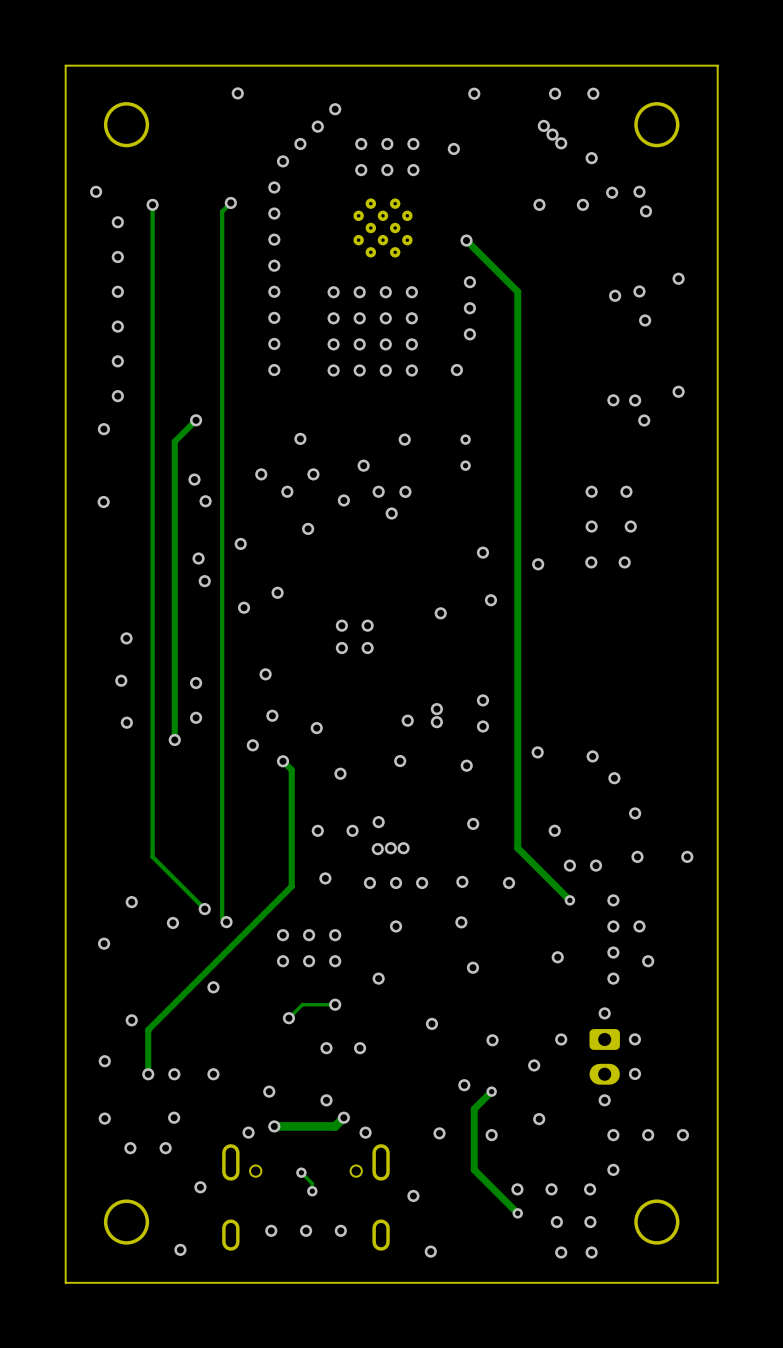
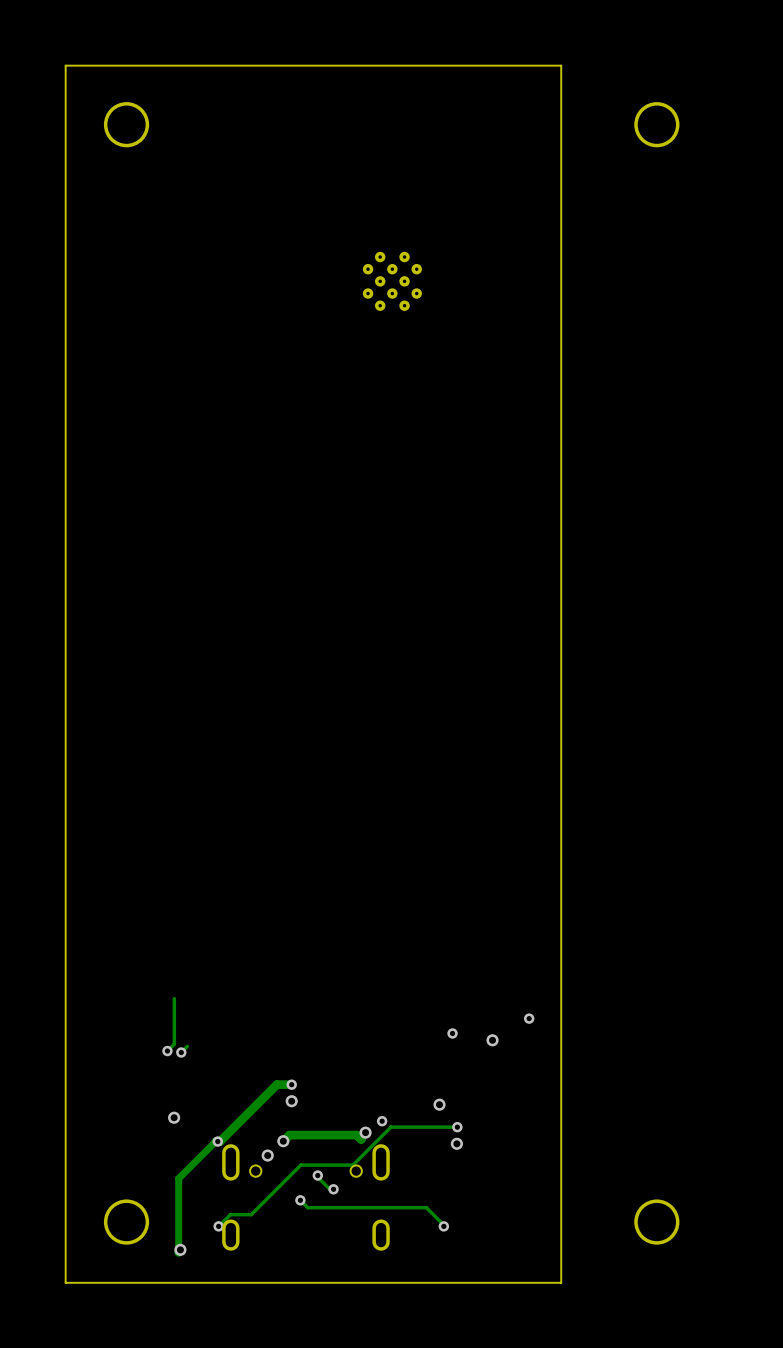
board edge: (561, 65) (717, 65) (717, 1282) (561, 1282) -> (561, 65) (561, 1282)
via: (237, 93) -> none
via: (474, 93) -> none
via: (555, 93) -> none
via: (593, 93) -> none
via: (335, 109) -> none
via: (543, 125) -> none
via: (317, 126) -> none
via: (552, 134) -> none
via: (561, 143) -> none
via: (300, 144) -> none
via: (361, 144) -> none
via: (387, 144) -> none
via: (413, 144) -> none
via: (453, 148) -> none
via: (591, 158) -> none
via: (283, 161) -> none
via: (361, 170) -> none
via: (387, 170) -> none
via: (413, 170) -> none
via: (274, 187) -> none
via: (96, 191) -> none
via: (639, 191) -> none
via: (612, 192) -> none
track: (152, 202) (152, 856) (204, 909) -> none
track: (230, 202) (222, 211) (222, 917) (226, 922) -> none
via: (230, 202) -> none
via: (152, 204) -> none
via: (539, 204) -> none
via: (582, 204) -> none
via: (645, 211) -> none
via: (274, 213) -> none
via: (117, 222) -> none
part position: (382, 227) -> (392, 281)
via: (274, 239) -> none
track: (466, 240) (517, 291) (517, 848) (569, 900) -> none
via: (466, 240) -> none
via: (117, 257) -> none
via: (274, 265) -> none
via: (678, 278) -> none
via: (469, 282) -> none
via: (117, 291) -> none
via: (274, 291) -> none
via: (639, 291) -> none
via: (333, 292) -> none
via: (359, 292) -> none
via: (385, 292) -> none
via: (411, 292) -> none
via: (615, 295) -> none
via: (469, 308) -> none
via: (274, 317) -> none
via: (333, 318) -> none
via: (359, 318) -> none
via: (385, 318) -> none
via: (411, 318) -> none
via: (645, 320) -> none
via: (117, 326) -> none
via: (469, 334) -> none
via: (274, 343) -> none
via: (333, 344) -> none
via: (359, 344) -> none
via: (385, 344) -> none
via: (411, 344) -> none
via: (117, 361) -> none
via: (274, 370) -> none
via: (333, 370) -> none
via: (359, 370) -> none
via: (385, 370) -> none
via: (411, 370) -> none
via: (456, 370) -> none
via: (678, 391) -> none
via: (117, 396) -> none
via: (613, 400) -> none
via: (635, 400) -> none
track: (196, 420) (174, 441) (174, 739) -> none
via: (196, 420) -> none
via: (644, 420) -> none
via: (103, 429) -> none
via: (300, 438) -> none
via: (404, 439) -> none
via: (465, 439) -> none
via: (363, 465) -> none
via: (465, 465) -> none
via: (261, 474) -> none
via: (313, 474) -> none
via: (194, 479) -> none
via: (287, 491) -> none
via: (378, 491) -> none
via: (405, 491) -> none
via: (591, 491) -> none
via: (626, 491) -> none
via: (343, 500) -> none
via: (205, 501) -> none
via: (103, 502) -> none
via: (391, 513) -> none
via: (591, 526) -> none
via: (630, 526) -> none
via: (308, 528) -> none
via: (240, 543) -> none
via: (482, 552) -> none
via: (198, 558) -> none
via: (591, 562) -> none
via: (624, 562) -> none
via: (538, 564) -> none
via: (204, 581) -> none
via: (277, 592) -> none
via: (490, 600) -> none
via: (244, 607) -> none
via: (440, 613) -> none
via: (341, 625) -> none
via: (367, 625) -> none
via: (126, 638) -> none
via: (341, 648) -> none
via: (367, 648) -> none
via: (265, 674) -> none
via: (121, 680) -> none
via: (196, 683) -> none
via: (482, 700) -> none
via: (436, 709) -> none
via: (272, 715) -> none
via: (196, 717) -> none
via: (407, 720) -> none
via: (126, 722) -> none
via: (436, 722) -> none
via: (482, 726) -> none
via: (316, 728) -> none
via: (174, 739) -> none
via: (252, 745) -> none
via: (537, 752) -> none
via: (592, 756) -> none
track: (283, 761) (291, 769) (291, 886) (148, 1029) (148, 1074) -> none
via: (283, 761) -> none
via: (400, 761) -> none
via: (466, 765) -> none
via: (340, 773) -> none
via: (614, 778) -> none
via: (635, 813) -> none
via: (378, 822) -> none
via: (473, 823) -> none
via: (317, 830) -> none
via: (352, 830) -> none
via: (554, 830) -> none
via: (390, 848) -> none
via: (403, 848) -> none
via: (377, 849) -> none
via: (637, 856) -> none
via: (687, 856) -> none
via: (569, 865) -> none
via: (595, 865) -> none
via: (325, 878) -> none
via: (462, 881) -> none
via: (369, 882) -> none
via: (396, 882) -> none
via: (422, 882) -> none
via: (509, 882) -> none
via: (569, 900) -> none
via: (613, 900) -> none
via: (131, 902) -> none
via: (204, 909) -> none
via: (172, 922) -> none
via: (226, 922) -> none
via: (461, 922) -> none
via: (396, 926) -> none
via: (613, 926) -> none
via: (639, 926) -> none
via: (283, 935) -> none
via: (309, 935) -> none
via: (335, 935) -> none
via: (104, 943) -> none
via: (613, 952) -> none
via: (557, 957) -> none
via: (283, 961) -> none
via: (309, 961) -> none
via: (335, 961) -> none
via: (648, 961) -> none
via: (472, 967) -> none
via: (378, 978) -> none
via: (613, 978) -> none
via: (213, 987) -> none
track: none -> (174, 998) (174, 1044) (167, 1051)
track: (335, 1004) (302, 1004) (288, 1018) -> none
via: (335, 1004) -> none
via: (604, 1013) -> none
via: (288, 1018) -> none
via: none -> (529, 1018)
via: (131, 1020) -> none
via: (431, 1023) -> none
via: none -> (452, 1033)
via: (561, 1039) -> none
via: (634, 1039) -> none
track: none -> (187, 1046) (181, 1052)
via: (326, 1048) -> none
via: (360, 1048) -> none
via: none -> (167, 1051)
via: none -> (181, 1052)
part: (604, 1056) -> none
via: (104, 1061) -> none
via: (534, 1065) -> none
via: (635, 1073) -> none
via: (148, 1074) -> none
via: (174, 1074) -> none
via: (213, 1074) -> none
track: none -> (291, 1084) (276, 1084) (220, 1141) (215, 1141) (178, 1178) (178, 1252)
via: none -> (291, 1084)
via: (464, 1085) -> none
via: (269, 1091) -> none
track: (491, 1091) (474, 1109) (474, 1169) (517, 1213) -> none
via: (491, 1091) -> none
via: (326, 1100) -> none
via: (604, 1100) -> none
via: none -> (291, 1101)
via: none -> (439, 1104)
track: (343, 1117) (335, 1126) (274, 1126) -> none
via: (343, 1117) -> none
via: (104, 1118) -> none
via: (539, 1119) -> none
via: none -> (382, 1121)
via: (274, 1126) -> none
track: none -> (457, 1127) (390, 1127) (353, 1165) (300, 1165) (251, 1214) (230, 1214) (218, 1226) (218, 1222)
via: none -> (457, 1127)
via: (248, 1132) -> none
via: (439, 1133) -> none
via: (491, 1135) -> none
via: (613, 1135) -> none
via: (648, 1135) -> none
via: (682, 1135) -> none
track: none -> (361, 1139) (356, 1135) (289, 1135) (283, 1141)
via: none -> (217, 1141)
via: none -> (283, 1141)
via: none -> (456, 1143)
via: (130, 1148) -> none
via: (165, 1148) -> none
via: none -> (267, 1155)
via: (613, 1169) -> none
track: (301, 1172) (312, 1183) (312, 1191) -> none
via: (301, 1172) -> none
track: none -> (317, 1175) (329, 1189) (333, 1189)
via: none -> (317, 1175)
via: (200, 1187) -> none
via: none -> (333, 1189)
via: (517, 1189) -> none
via: (551, 1189) -> none
via: (590, 1189) -> none
via: (312, 1191) -> none
via: (413, 1195) -> none
track: none -> (300, 1200) (307, 1207) (426, 1207) (443, 1226)
via: none -> (300, 1200)
via: (517, 1213) -> none
via: (556, 1222) -> none
via: (590, 1222) -> none
via: none -> (218, 1226)
via: none -> (443, 1226)
via: (271, 1230) -> none
via: (306, 1230) -> none
via: (340, 1230) -> none
via: (430, 1251) -> none
via: (561, 1252) -> none
via: (591, 1252) -> none

